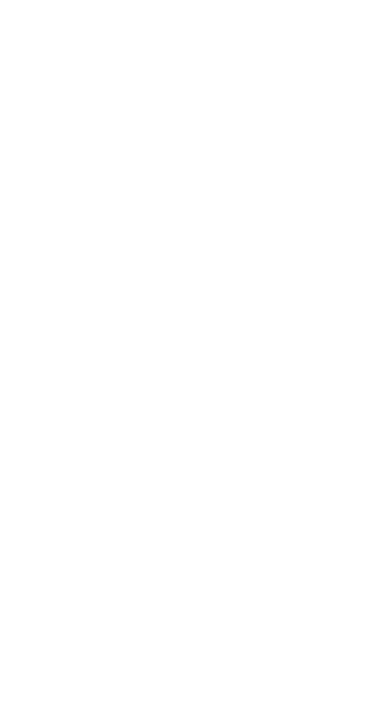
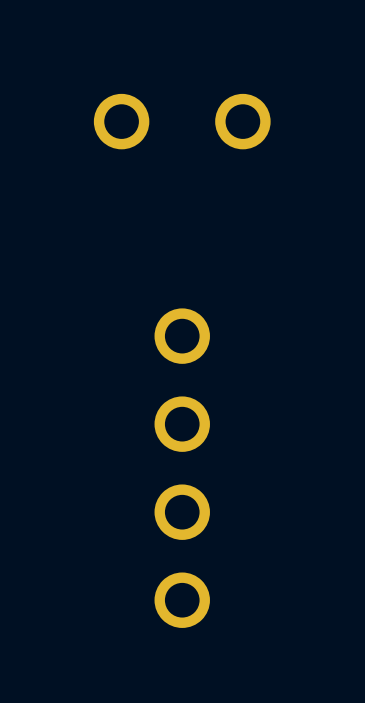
part: none -> (182, 121)
part: none -> (182, 468)

